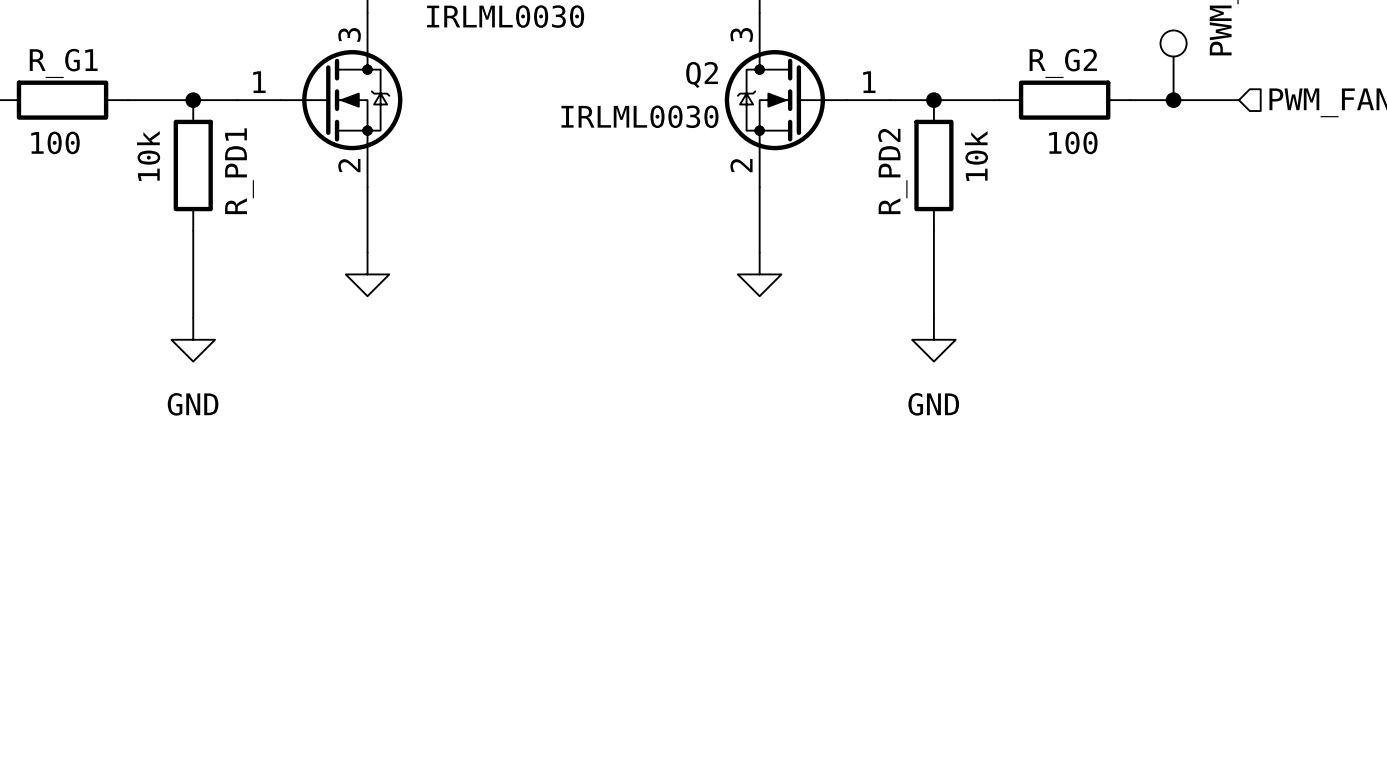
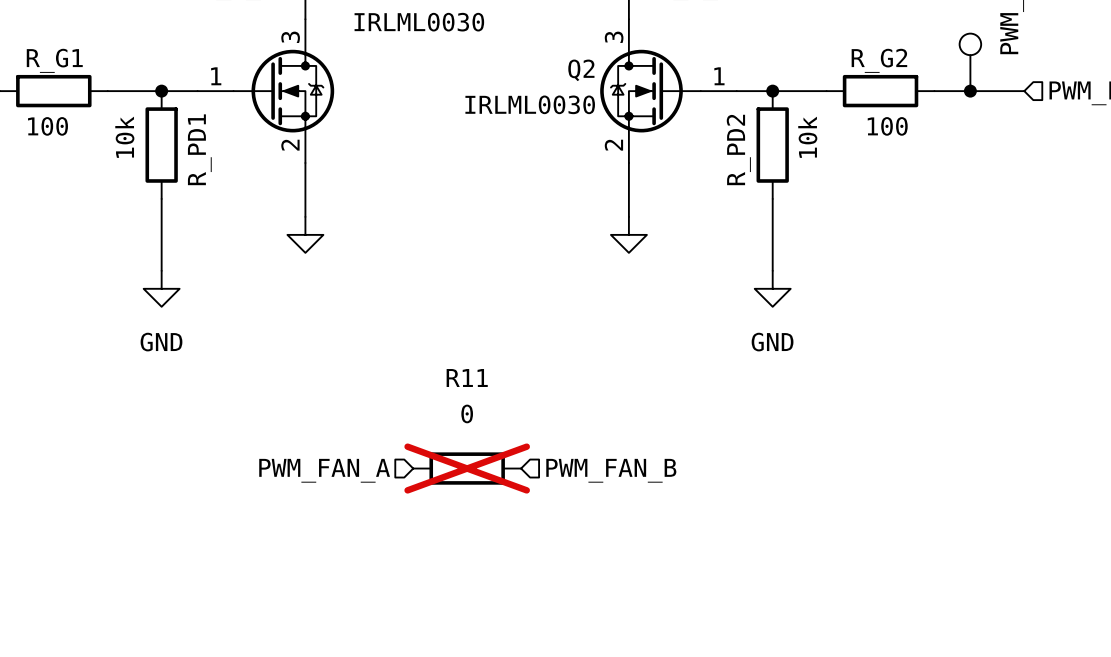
R11: none -> 0 (467, 468)
hierarchical label: none -> PWM_FAN_A (324, 470)
hierarchical label: none -> PWM_FAN_B (611, 470)

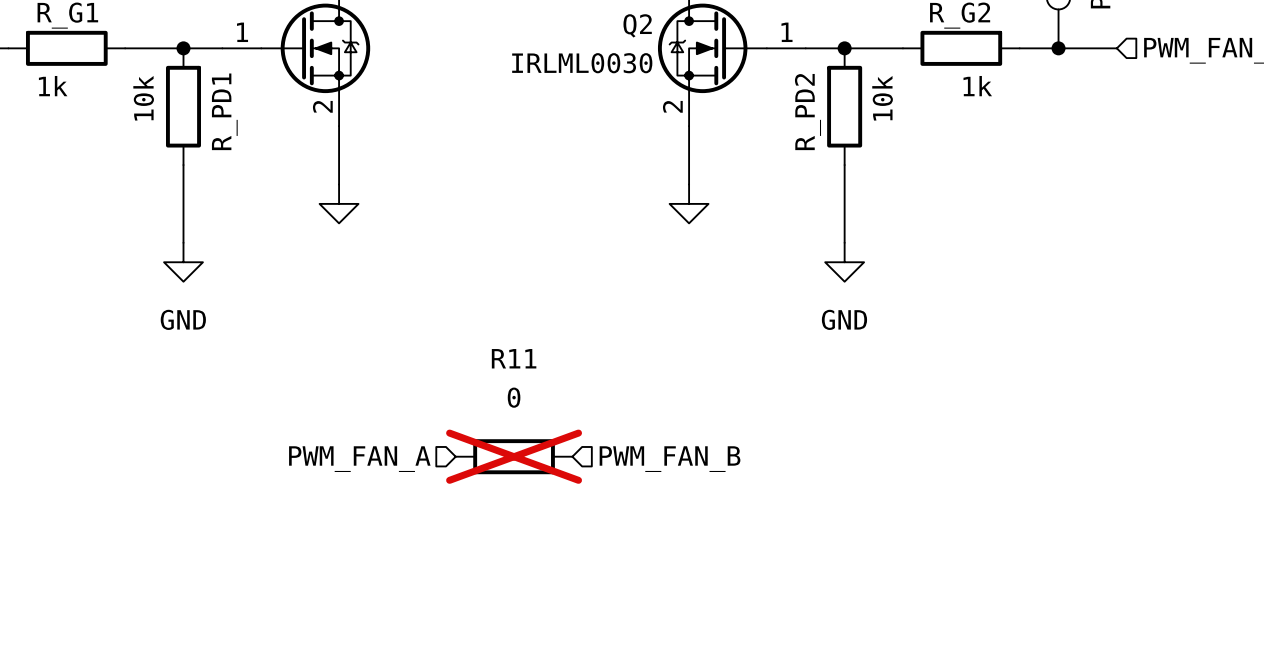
R_G1 value: 100 (48, 126) -> 1k (53, 86)
R_G2 value: 100 (887, 126) -> 1k (977, 86)

